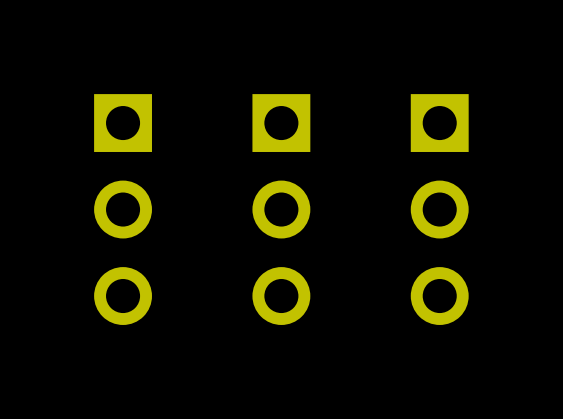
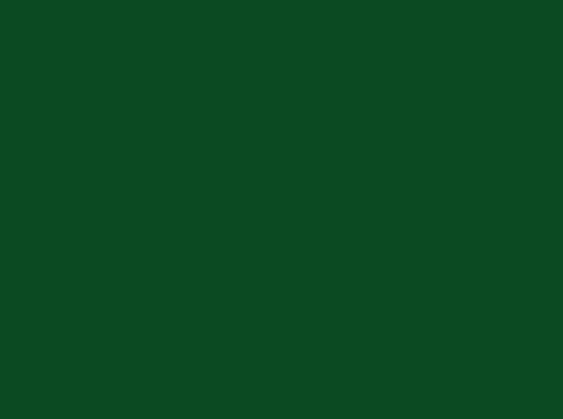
part: (123, 209) -> none
part: (281, 209) -> none
part: (439, 209) -> none

